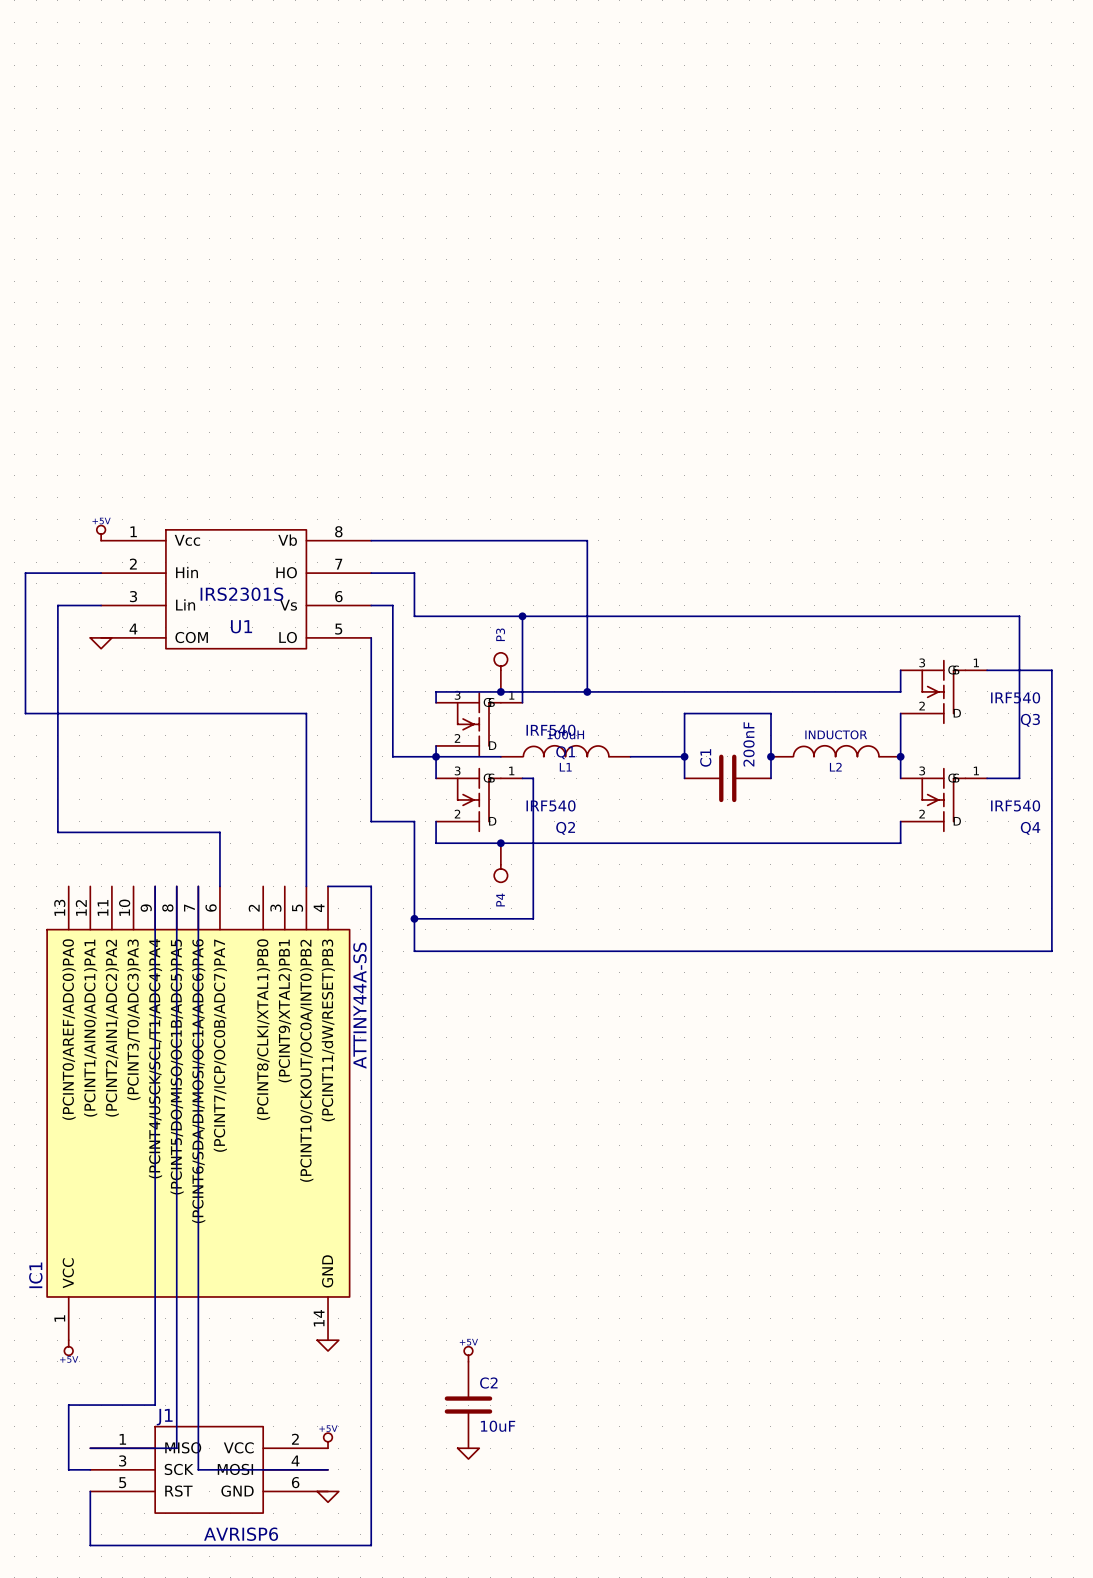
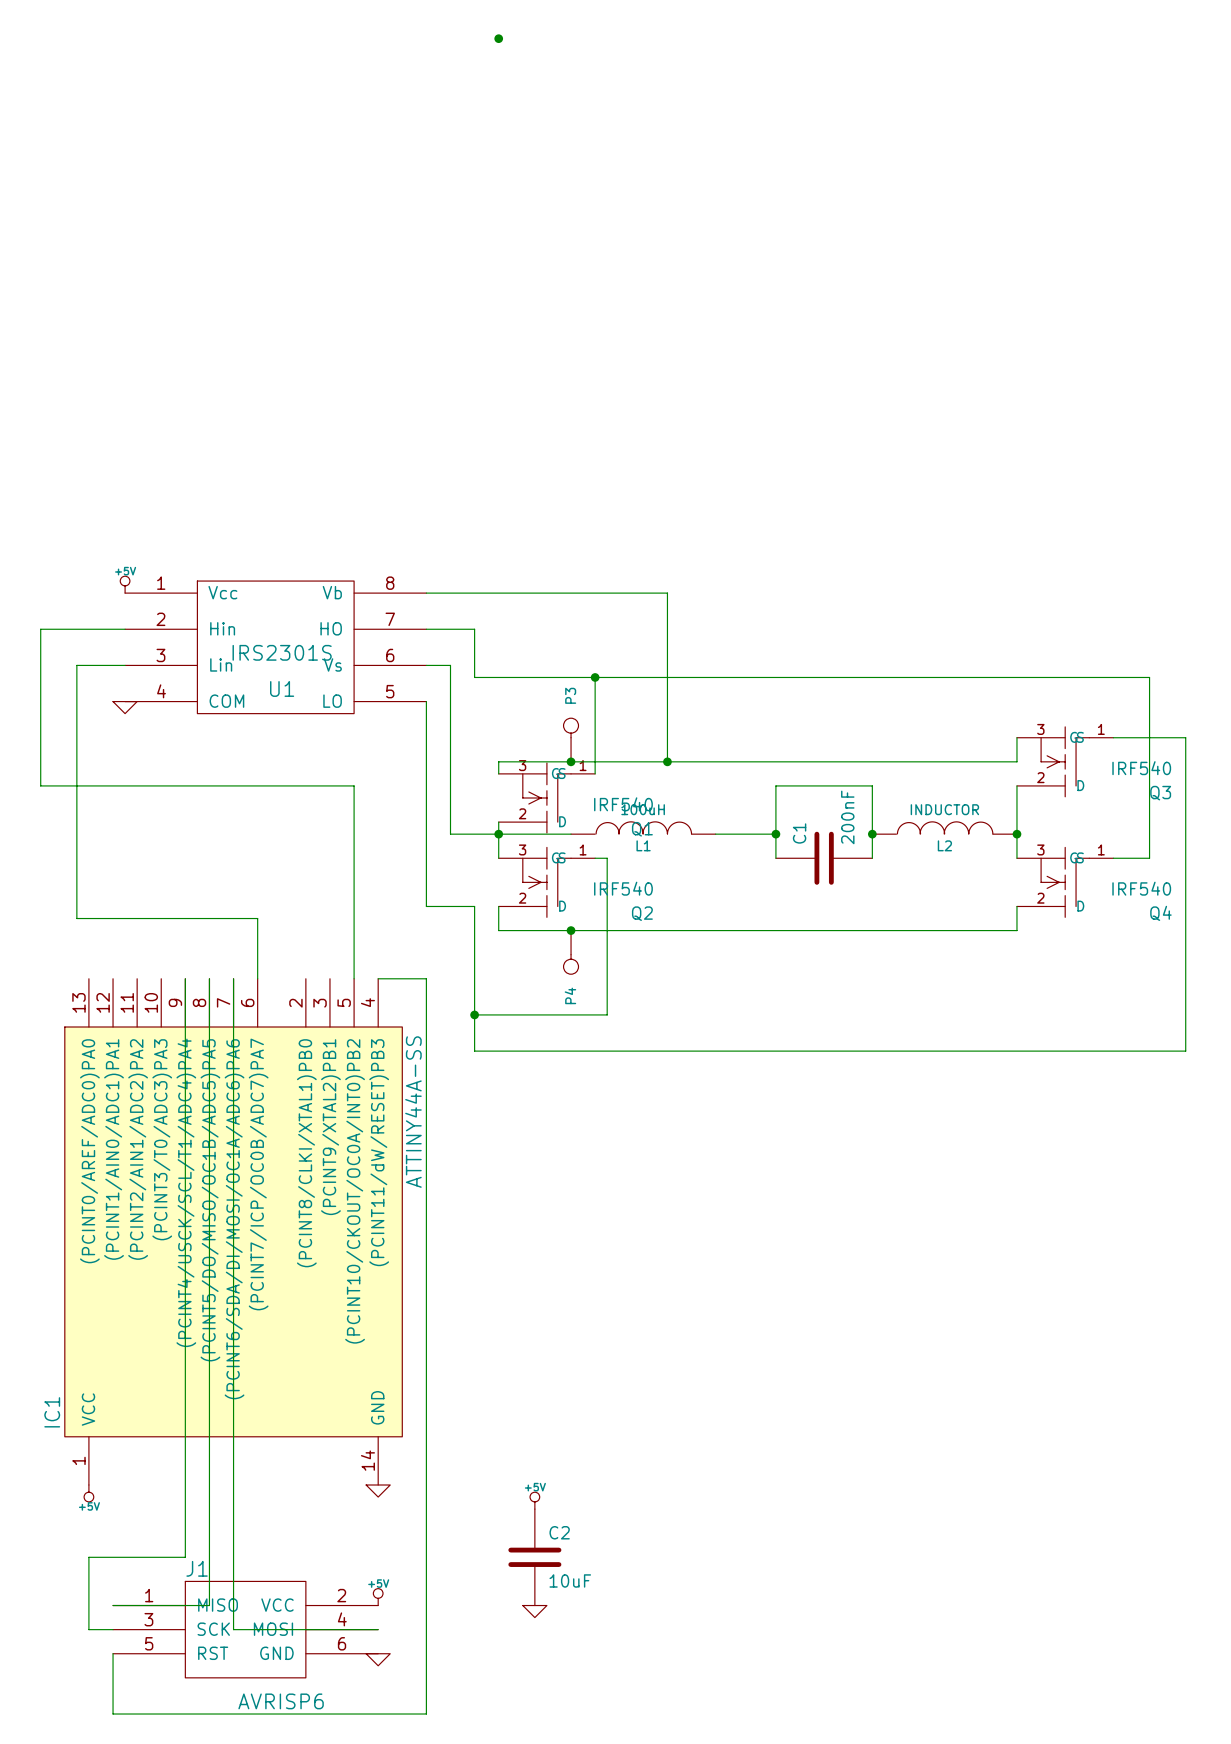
junction: none -> (498, 38)

